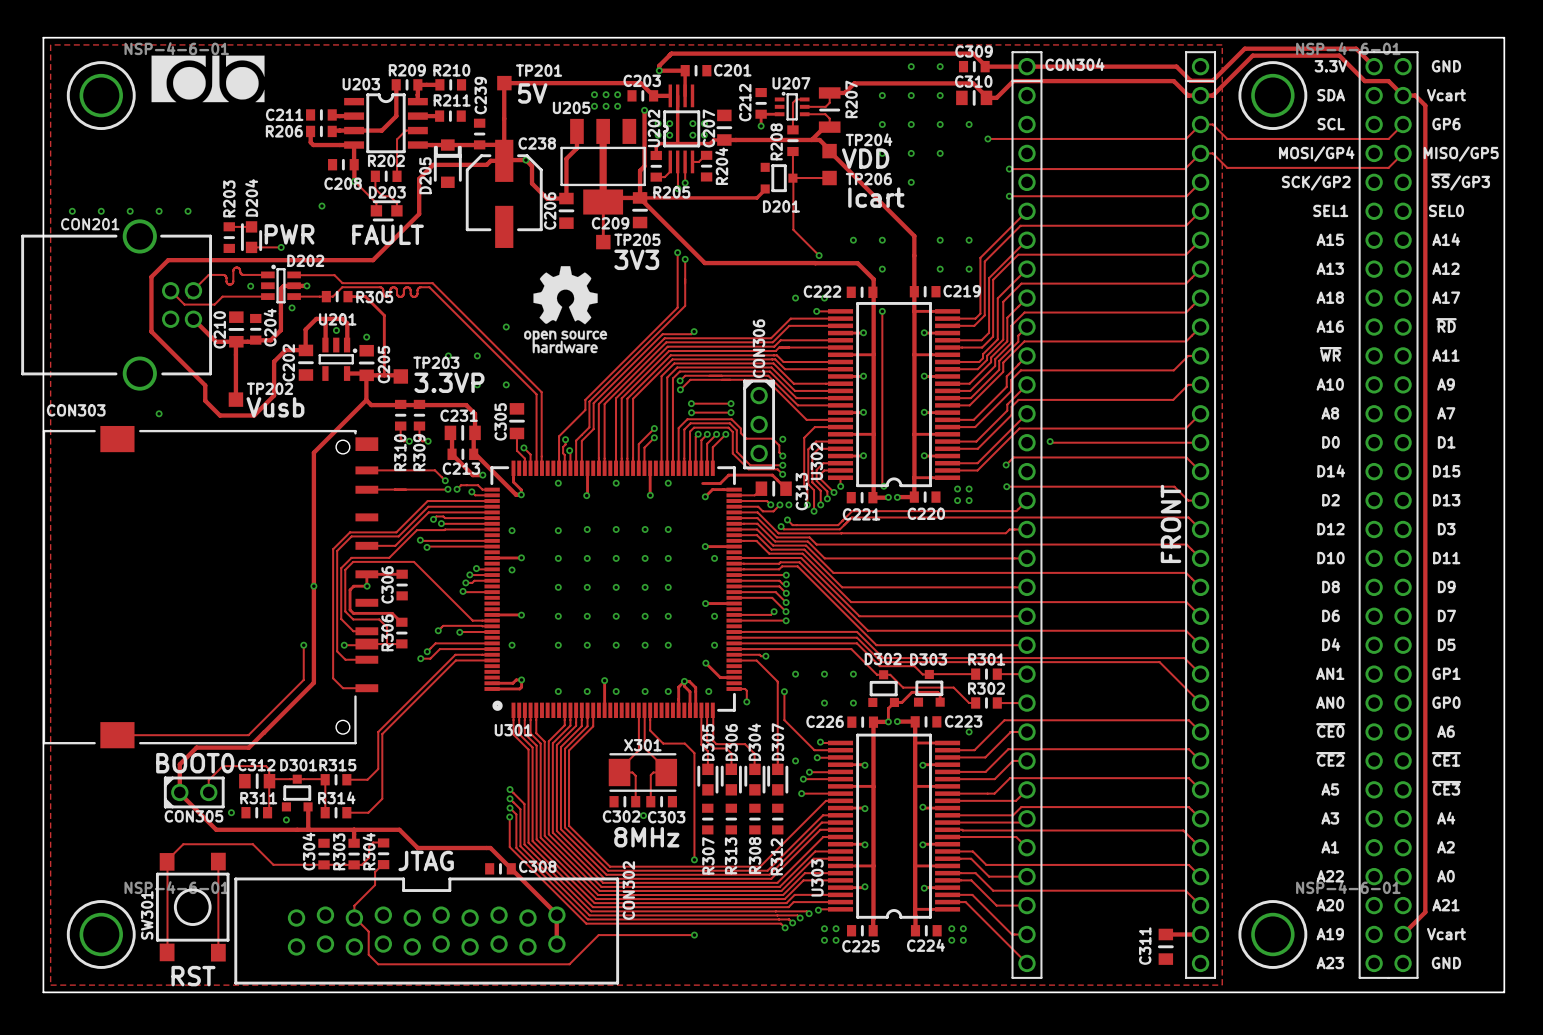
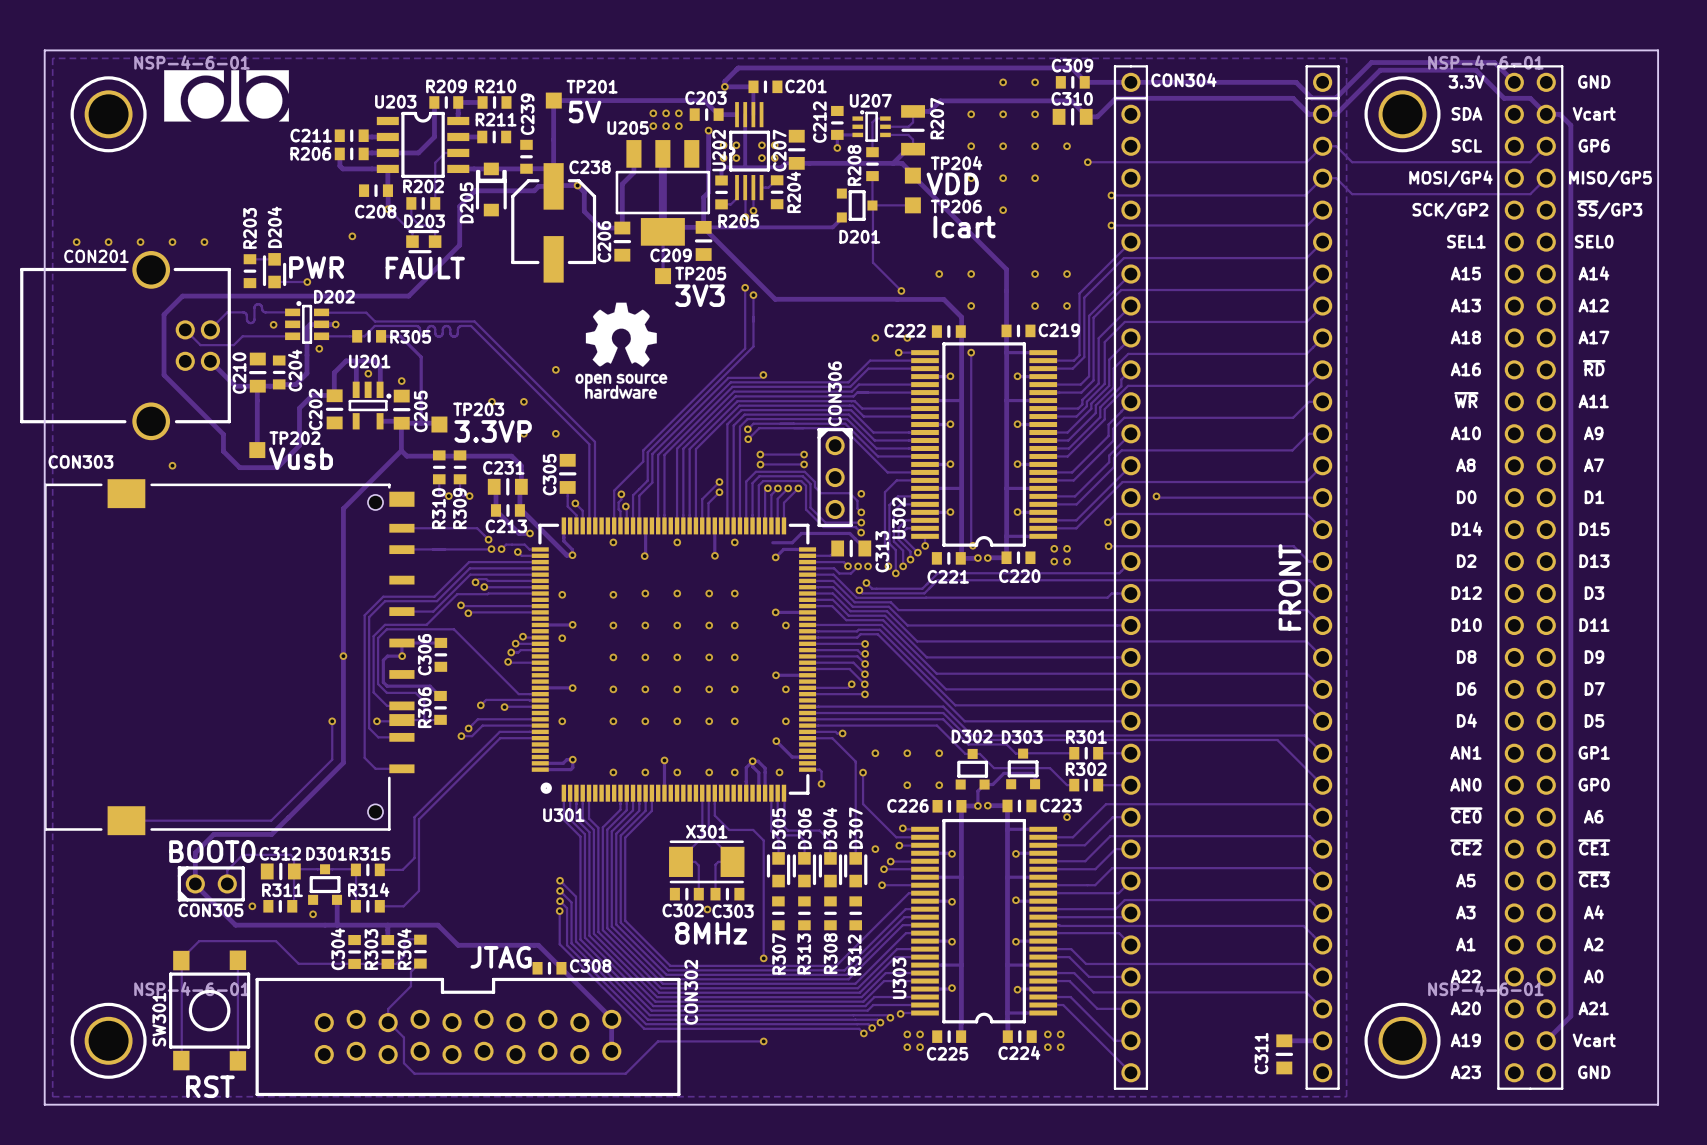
text position: JTAG (426, 860) -> JTAG (501, 957)

